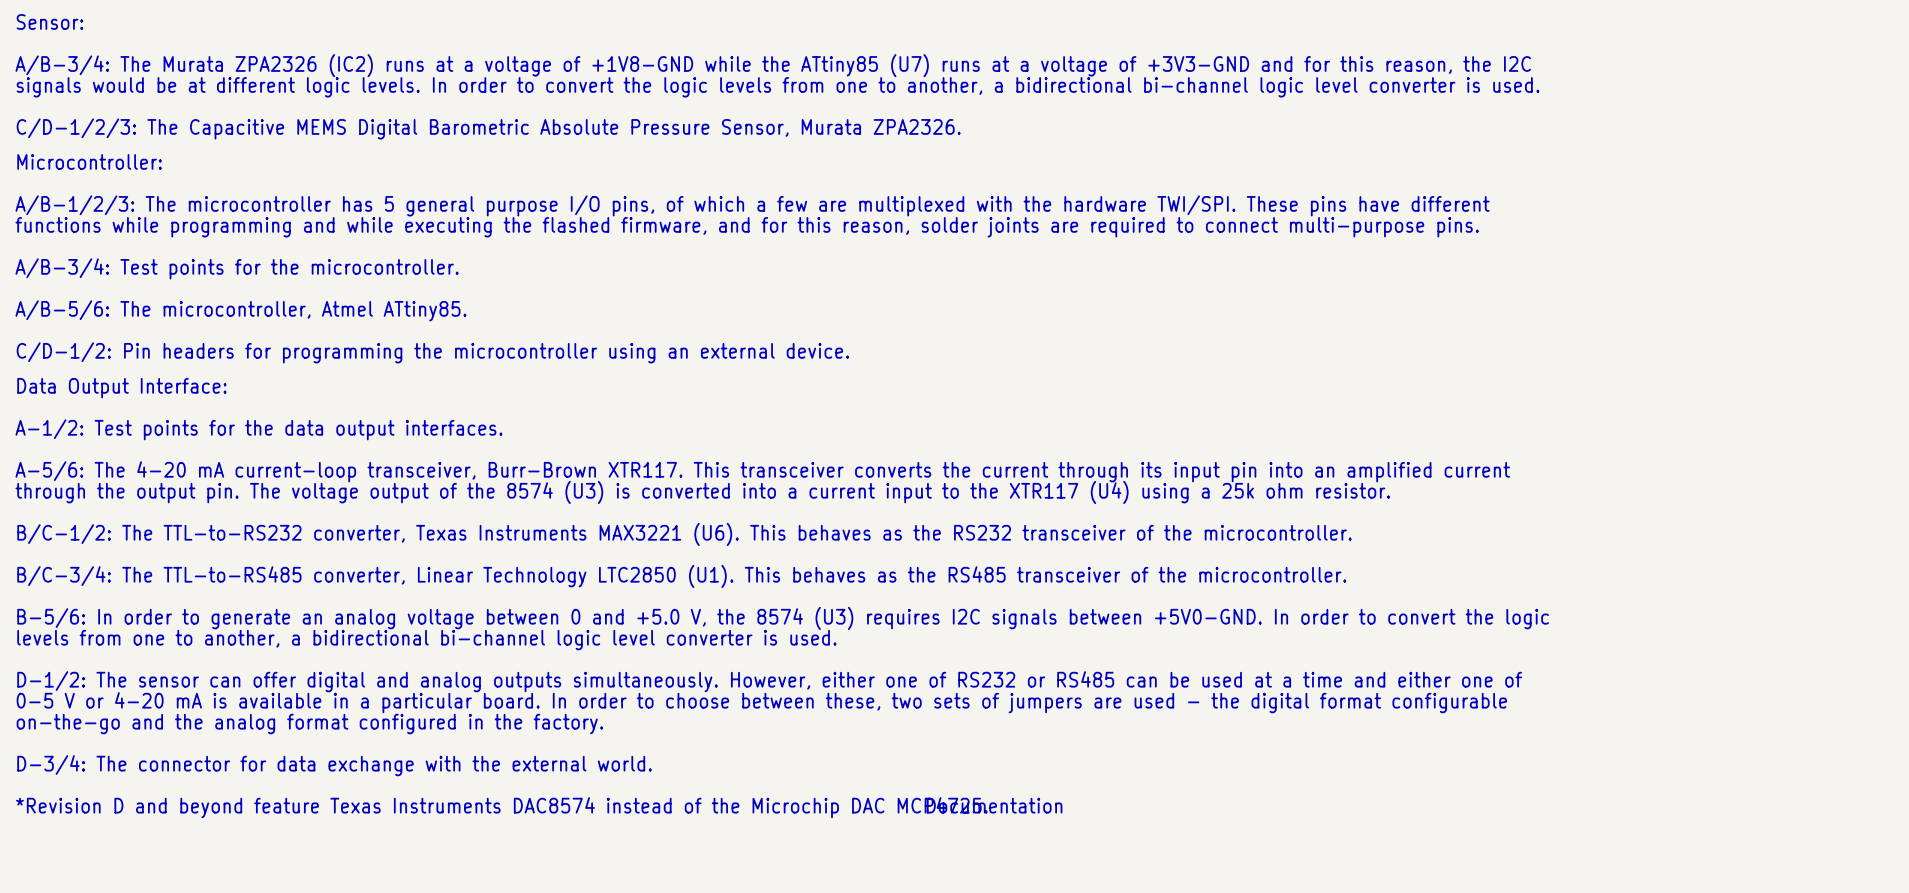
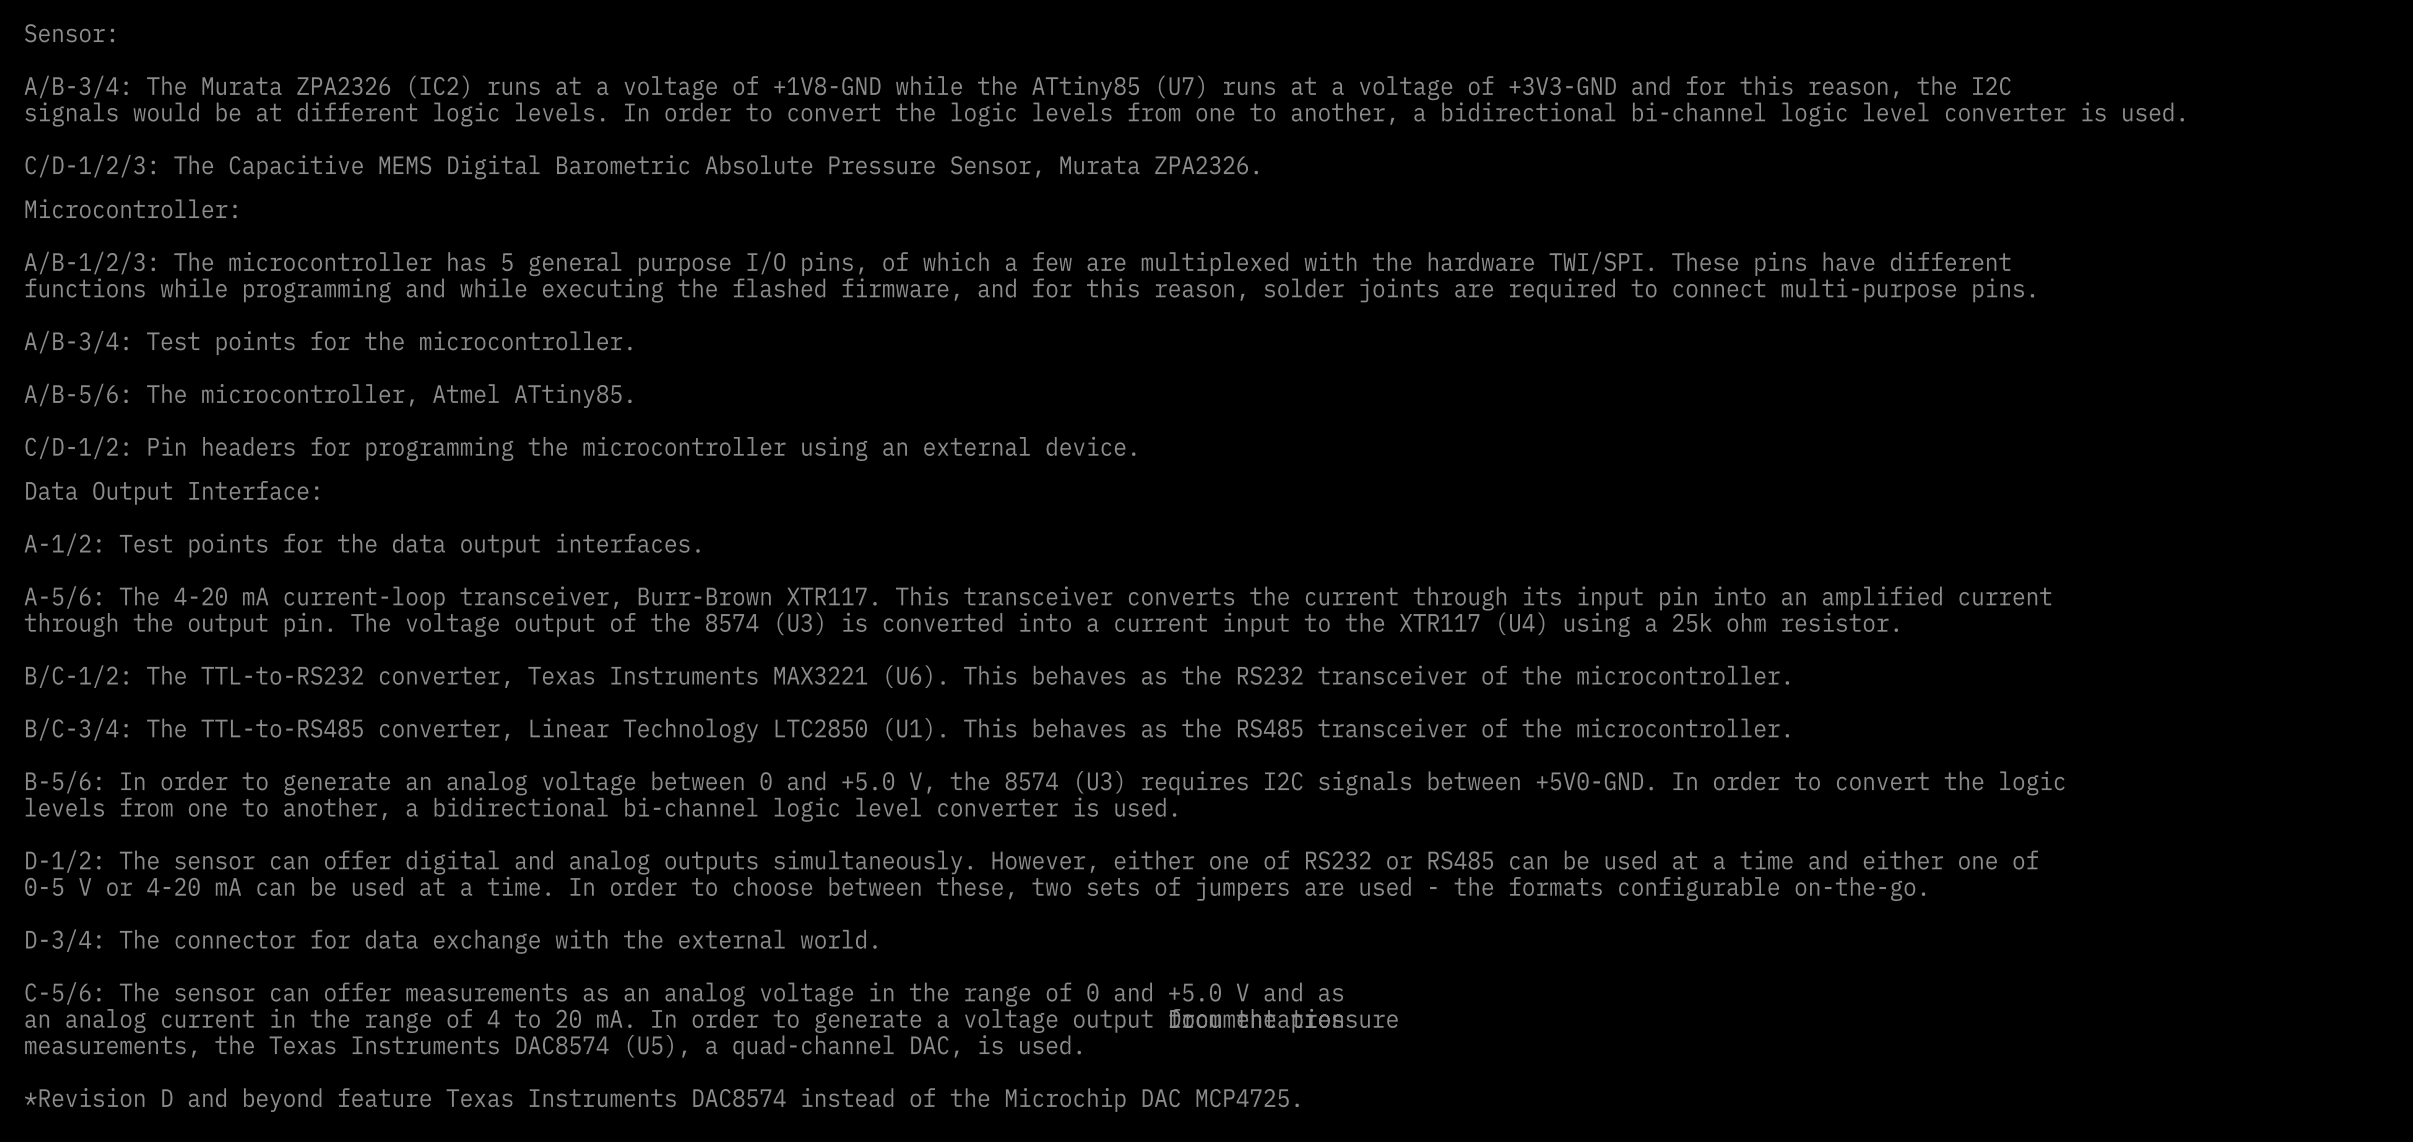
text: 0-5 V or 4-20 mA is available in a particular board. In order to choose between these, two sets of jumpers are used - the digital format configurable (761, 702) -> 0-5 V or 4-20 mA can be used at a time. In order to choose between these, two sets of jumpers are used - the formats configurable on-the-go. (975, 888)
text: on-the-go and the analog format configured in the factory. (309, 724) -> none
text position: D-3/4: The connector for data exchange with the external world. (334, 765) -> D-3/4: The connector for data exchange with the external world. (451, 941)
text: none -> C-5/6: The sensor can offer measurements as an analog voltage in the range of 0 and +5.0 V and as (684, 994)
text: *Revision D and beyond feature Texas Instruments DAC8574 instead of the Microchip DAC MCP4725. (501, 807) -> an analog current in the range of 4 to 20 mA. In order to generate a voltage output from the pressure (711, 1020)
text: none -> measurements, the Texas Instruments DAC8574 (U5), a quad-channel DAC, is used. (553, 1047)
text: none -> *Revision D and beyond feature Texas Instruments DAC8574 instead of the Microchip DAC MCP4725. (661, 1099)

